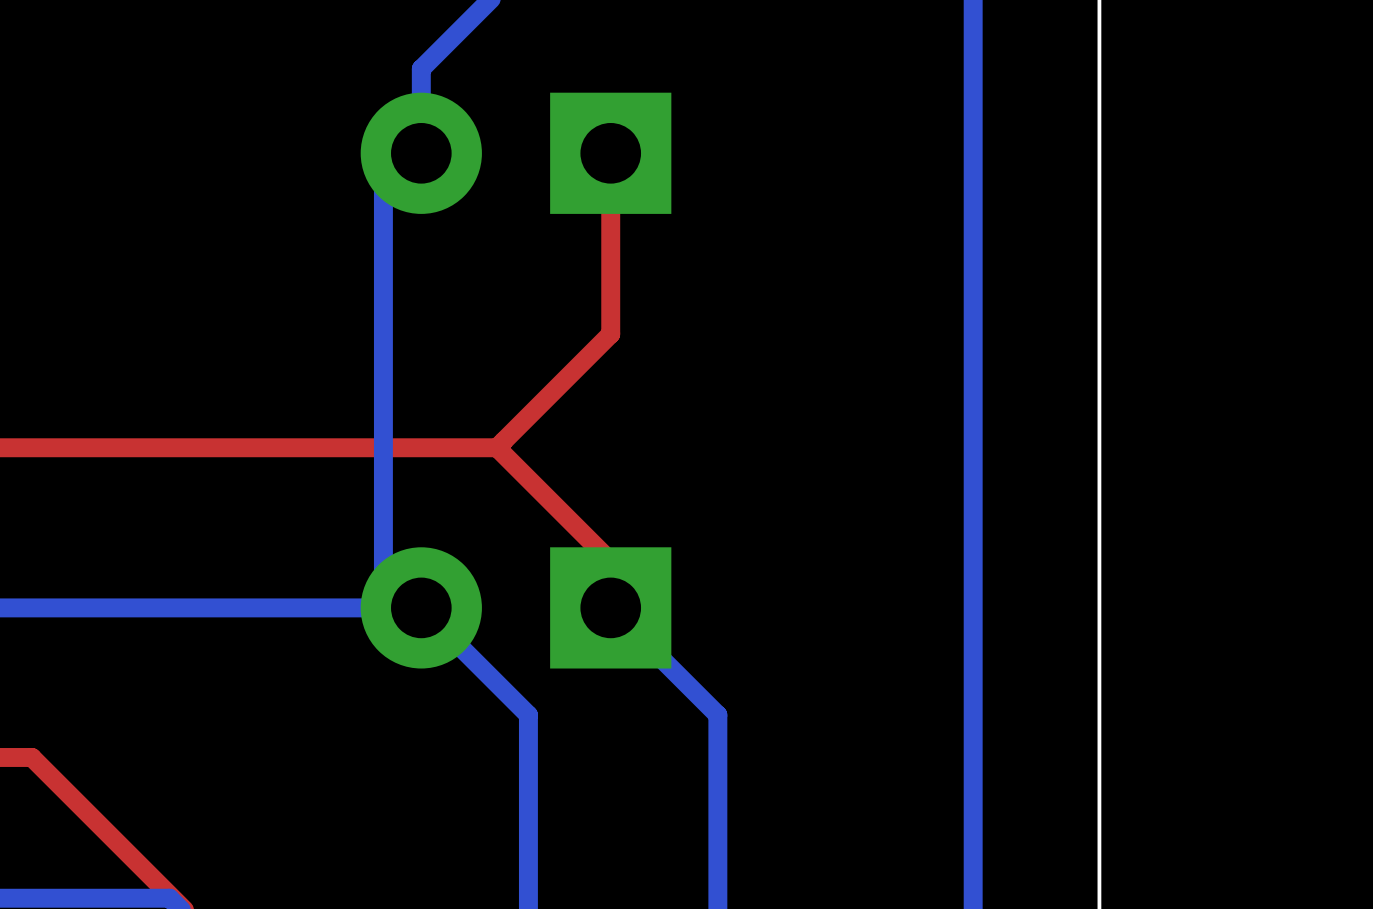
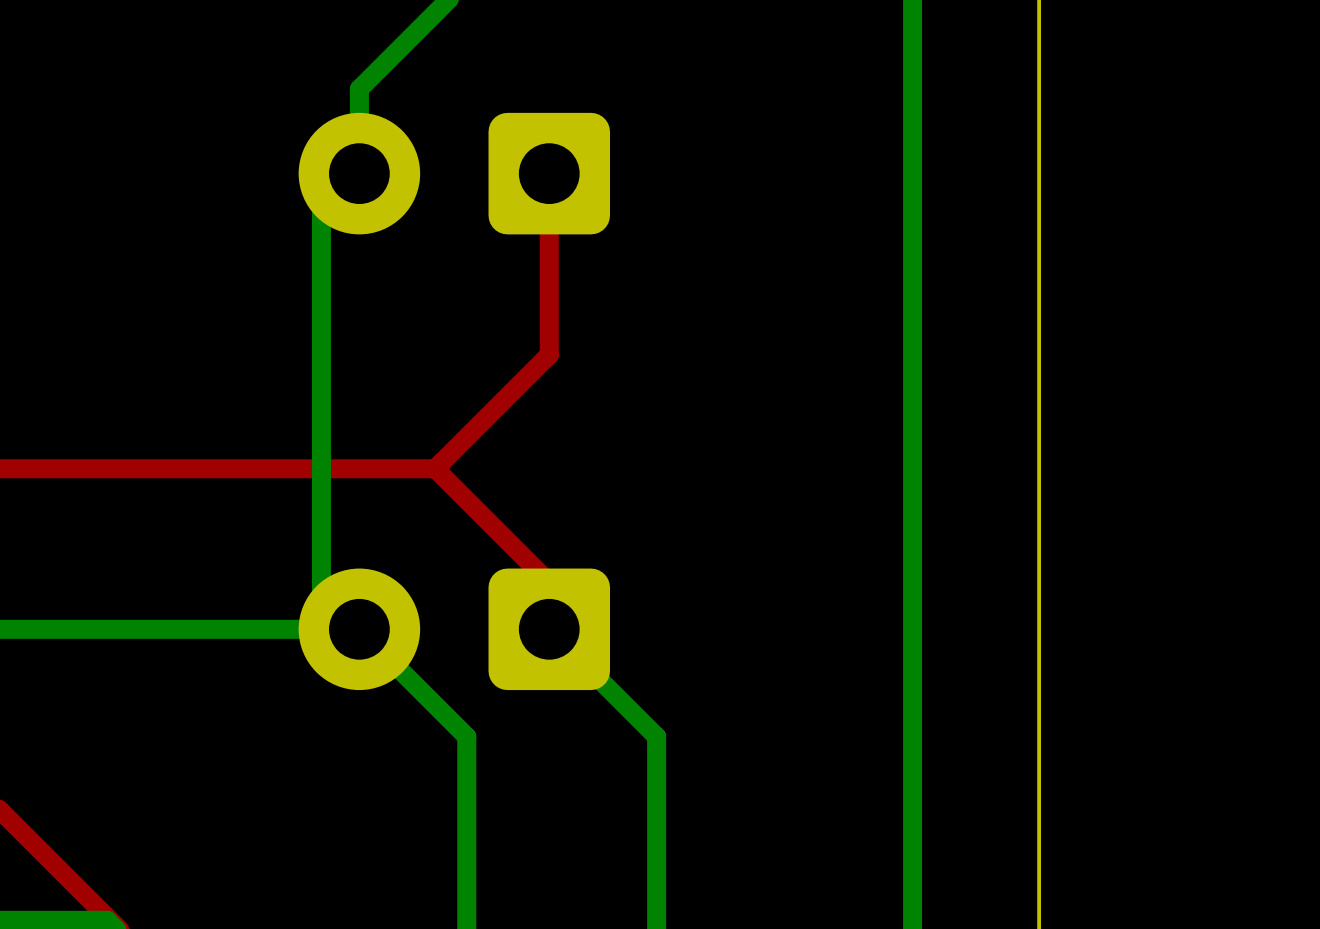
part footprint: [360, 92, 672, 214] -> [298, 112, 611, 235]
part footprint: [360, 547, 672, 669] -> [298, 568, 611, 691]

